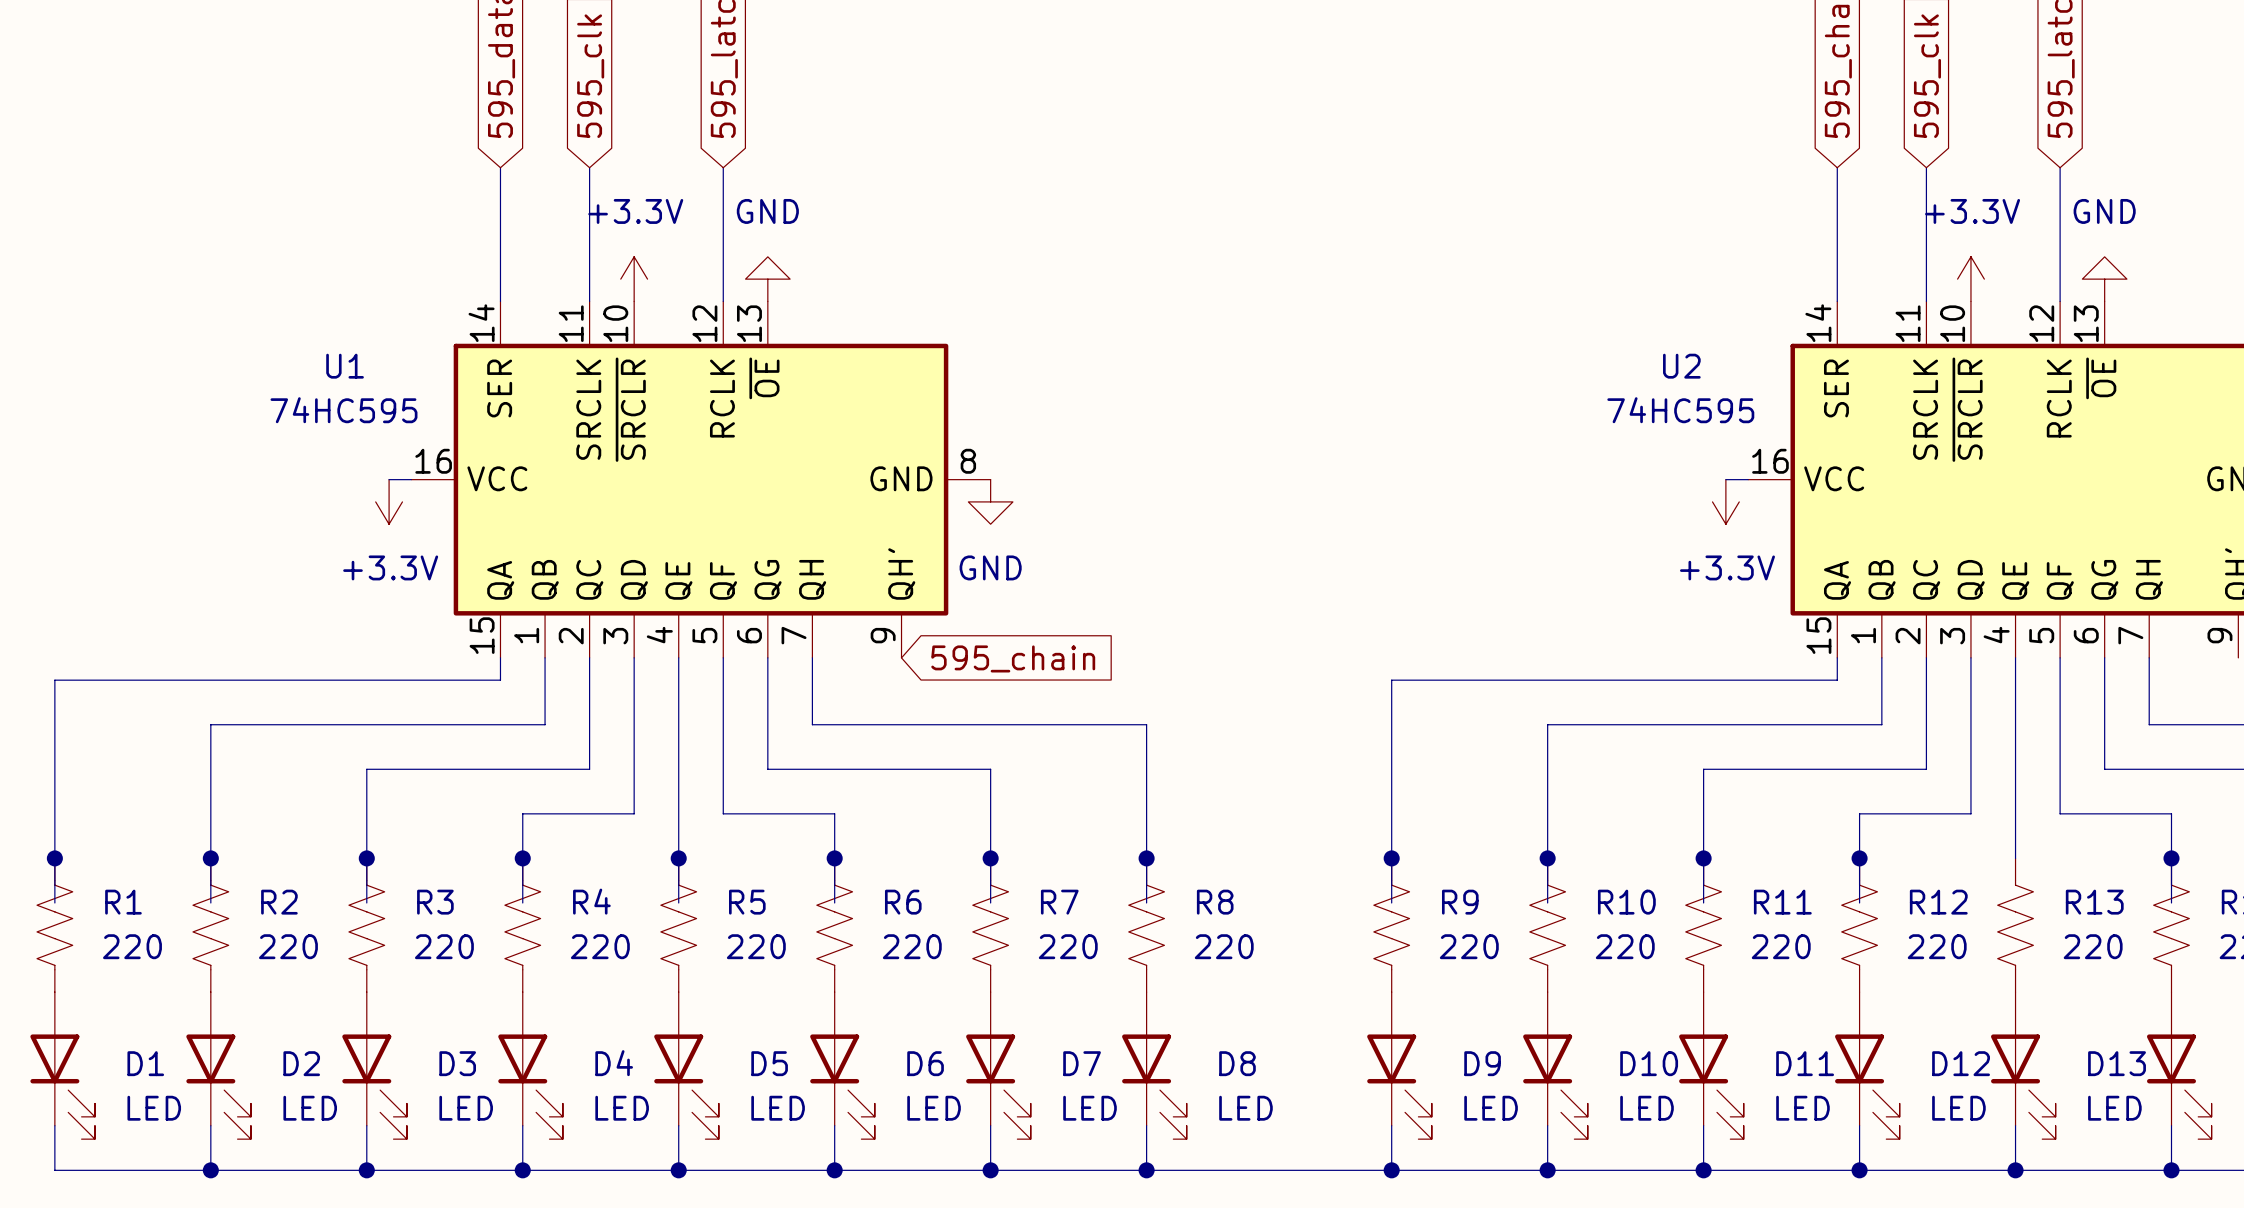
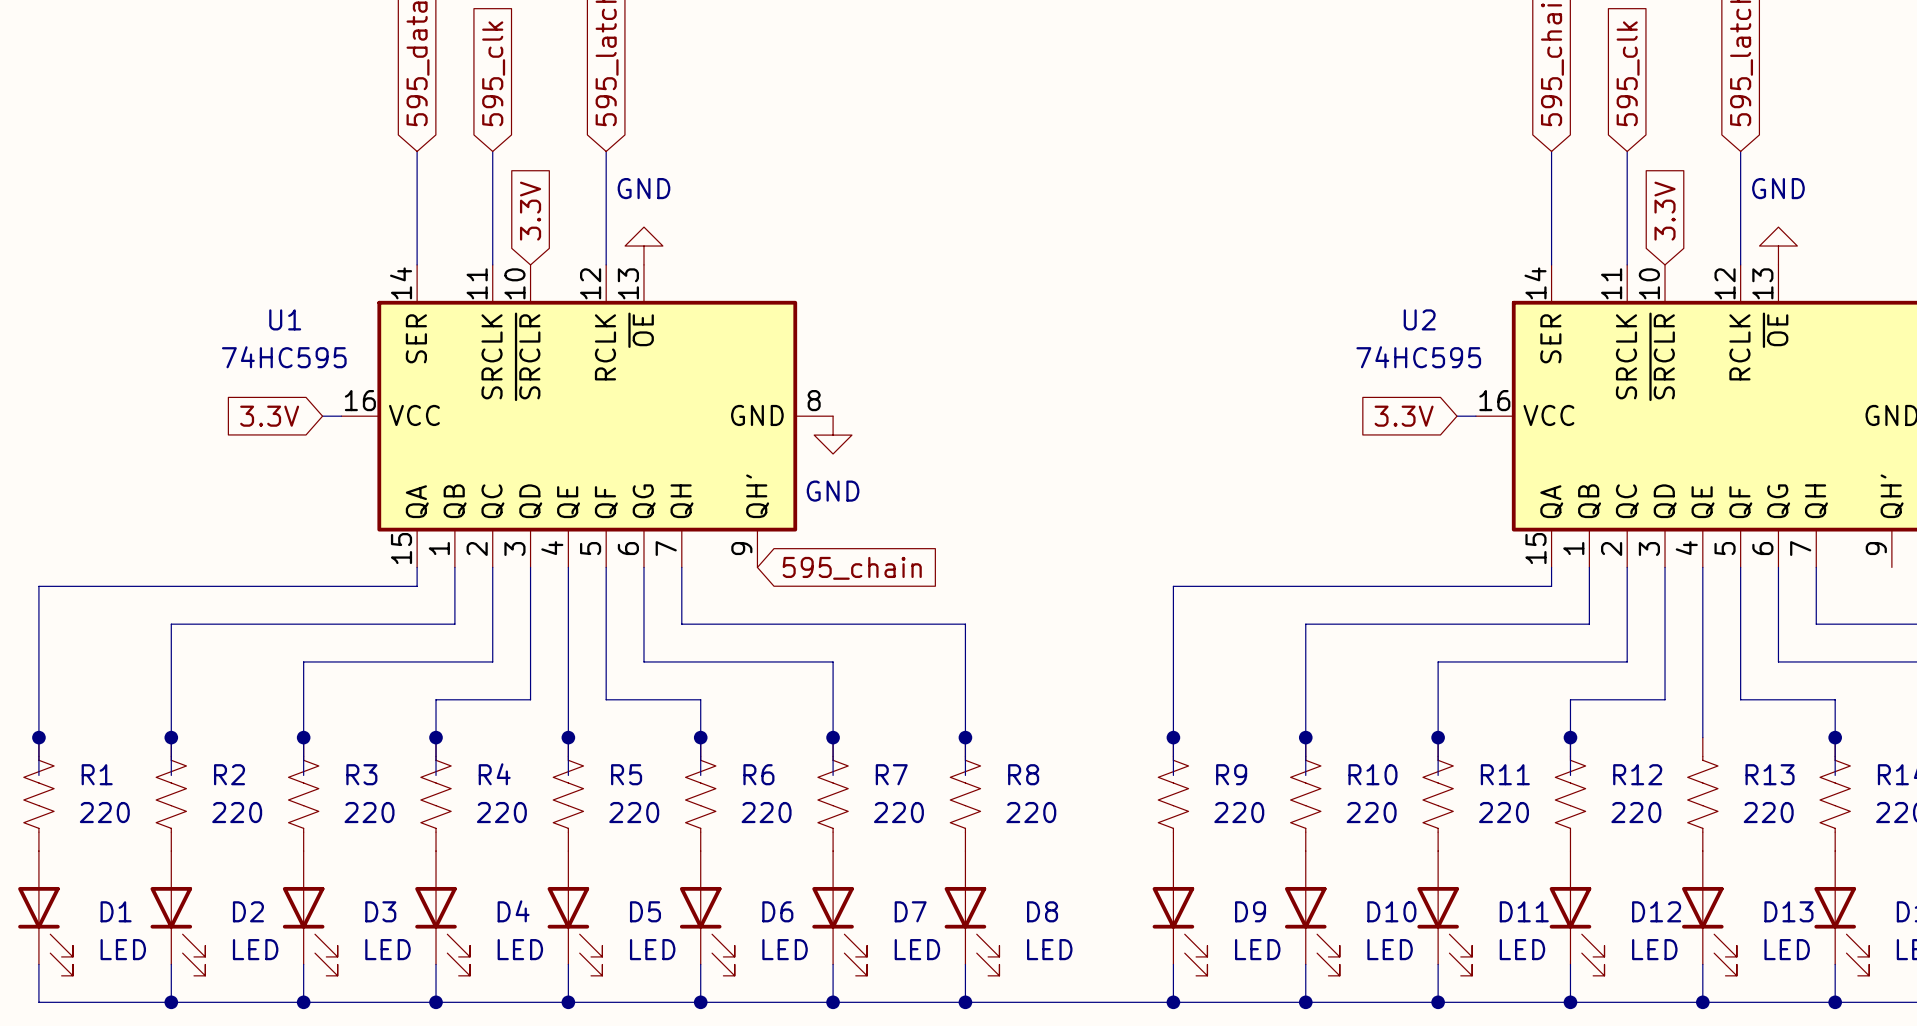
global label: none -> 3.3V (530, 211)
global label: none -> 3.3V (1665, 211)
power symbol: +3.3V (634, 279) -> none
power symbol: +3.3V (1970, 279) -> none
global label: none -> 3.3V (269, 416)
global label: none -> 3.3V (1404, 416)
power symbol: +3.3V (389, 501) -> none
power symbol: +3.3V (1725, 501) -> none

